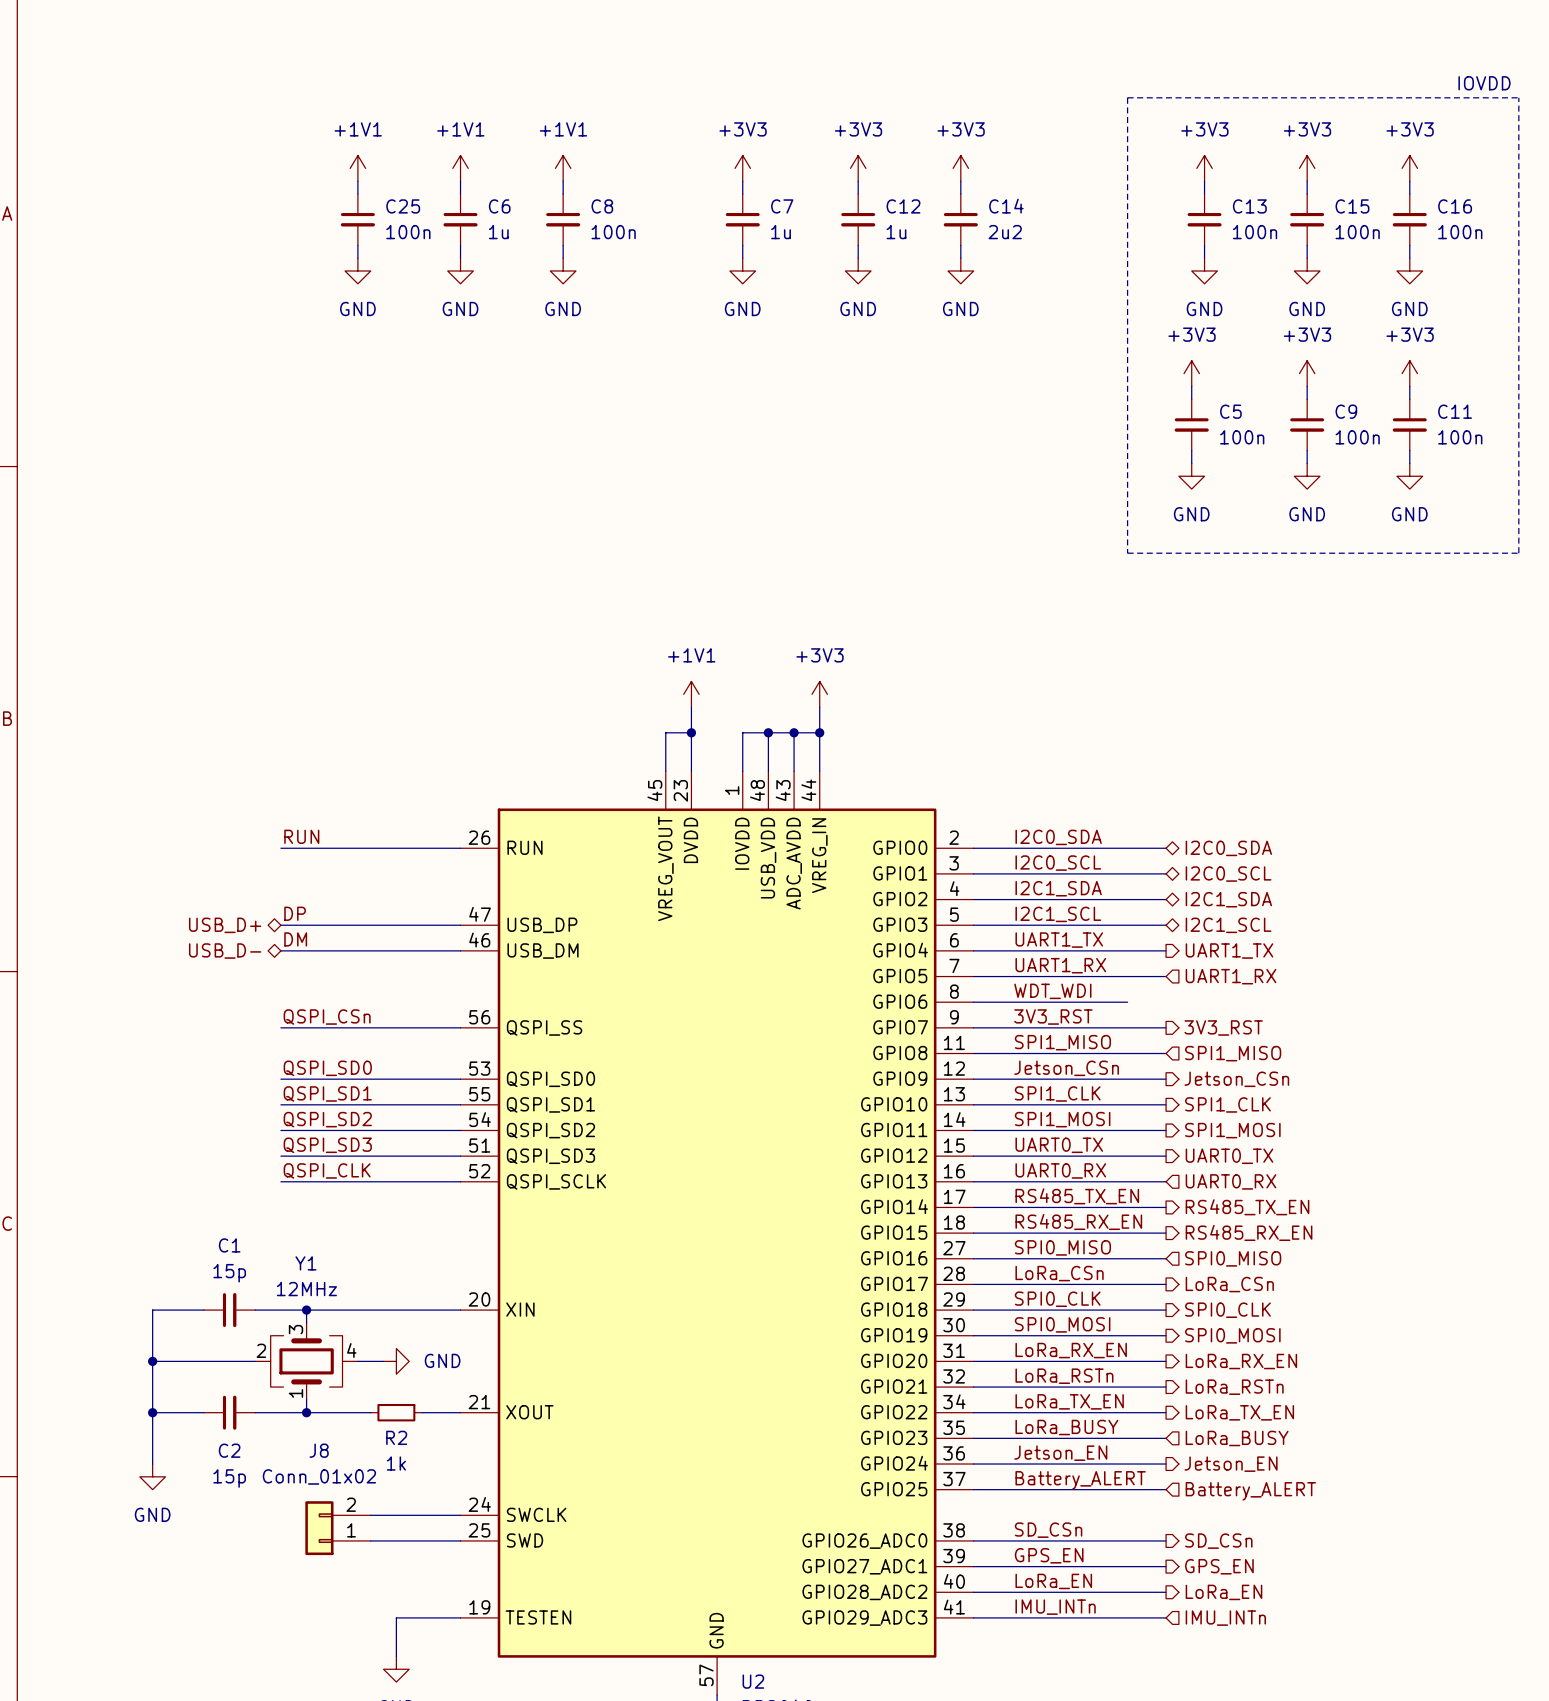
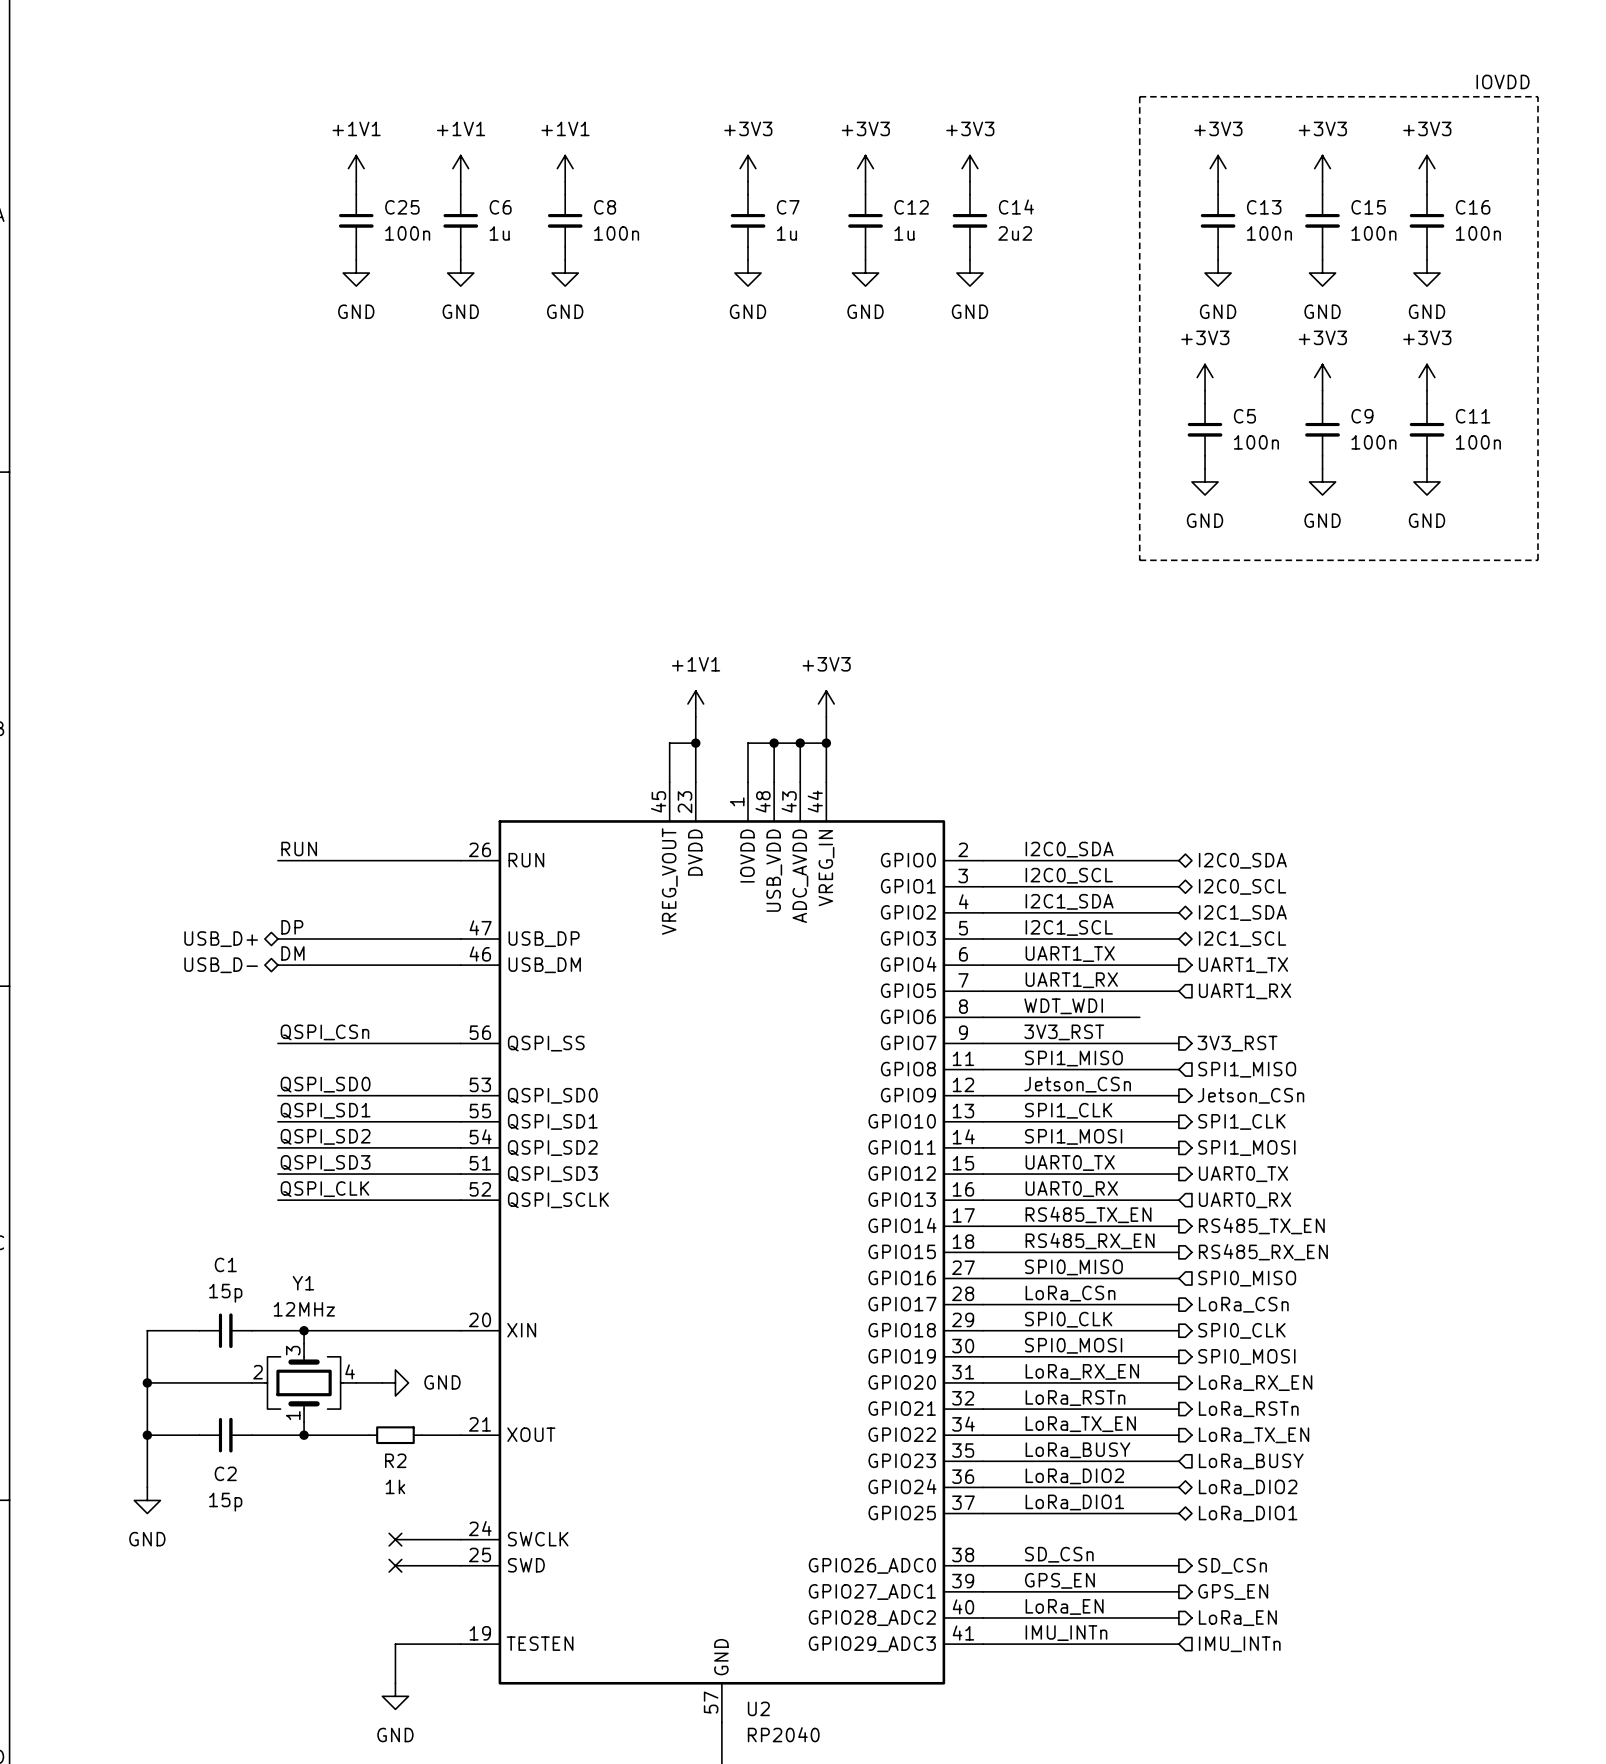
label: Jetson_EN (1060, 1453) -> LoRa_DIO2 (1074, 1476)
hierarchical label shape: output (1231, 1464) -> bidirectional (1248, 1487)
hierarchical label: Jetson_EN (1231, 1464) -> LoRa_DIO2 (1248, 1487)
label: Battery_ALERT (1080, 1480) -> LoRa_DIO1 (1074, 1502)
hierarchical label shape: input (1250, 1491) -> bidirectional (1248, 1513)
hierarchical label: Battery_ALERT (1250, 1491) -> LoRa_DIO1 (1248, 1513)
wire: (370, 1515) (396, 1515) -> none
no-connect mark: none -> (395, 1539)
J8: Conn_01x02 (338, 1528) -> none
wire: (370, 1540) (396, 1540) -> none
no-connect mark: none -> (395, 1565)

